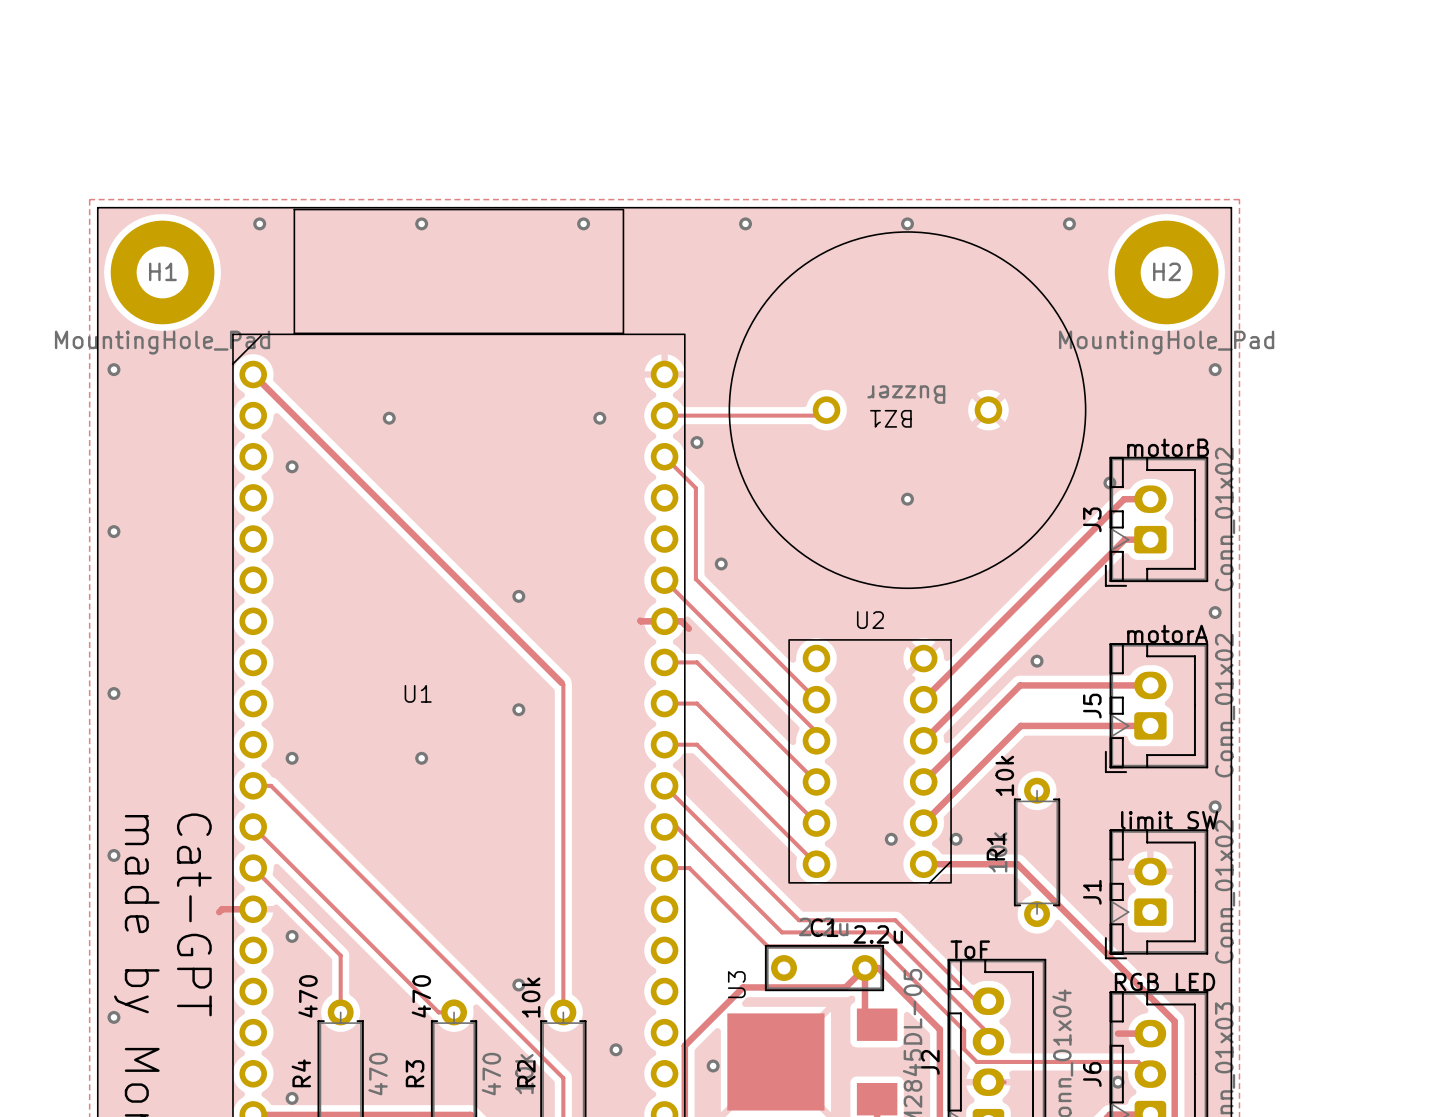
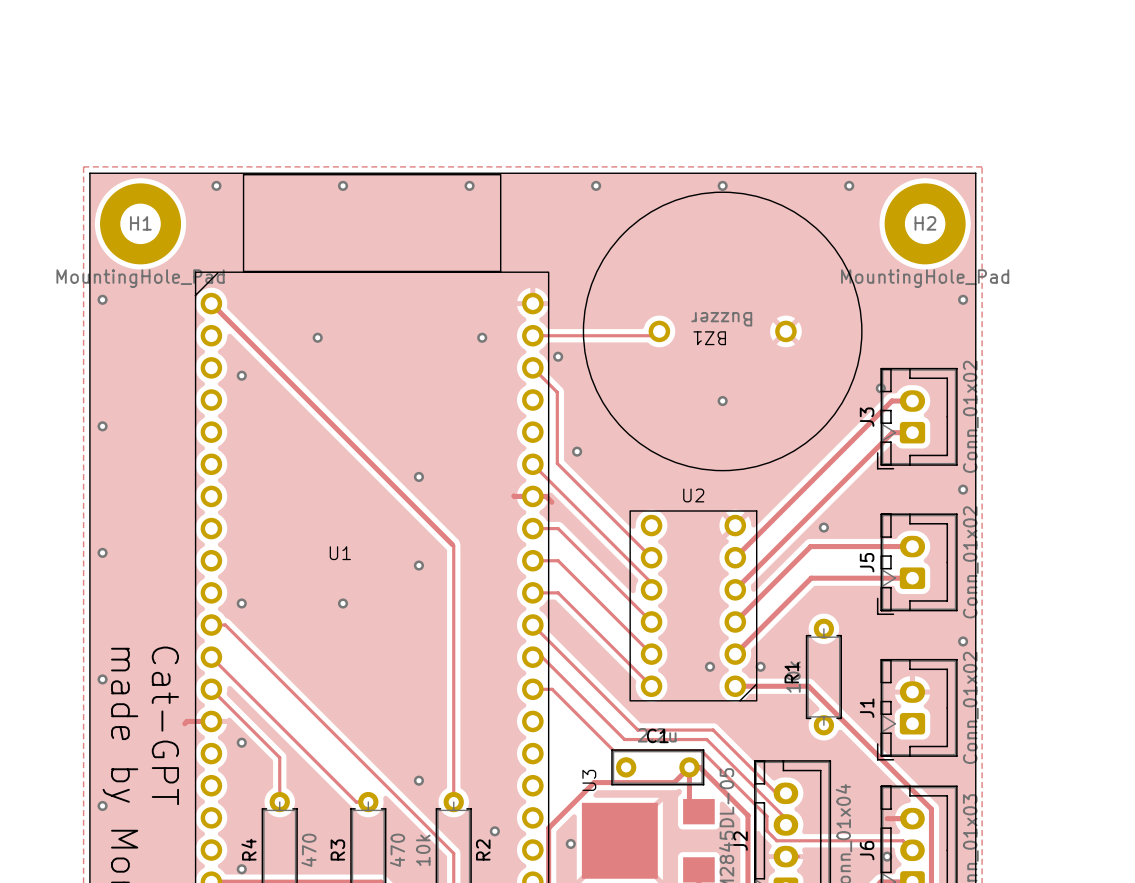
text: motorB (1168, 447) -> none
text: motorA (1167, 634) -> none
text: 10k (1004, 775) -> none
text: limit SW (1169, 820) -> none
text: 2.2u (878, 934) -> none
text: ToF (970, 949) -> none
text: RGB LED (1164, 982) -> none
text: 470 (308, 996) -> none
text: 470 (421, 996) -> none
text: 10k (531, 997) -> none
R2 name position: R2 (526, 1073) -> R2 (483, 849)

